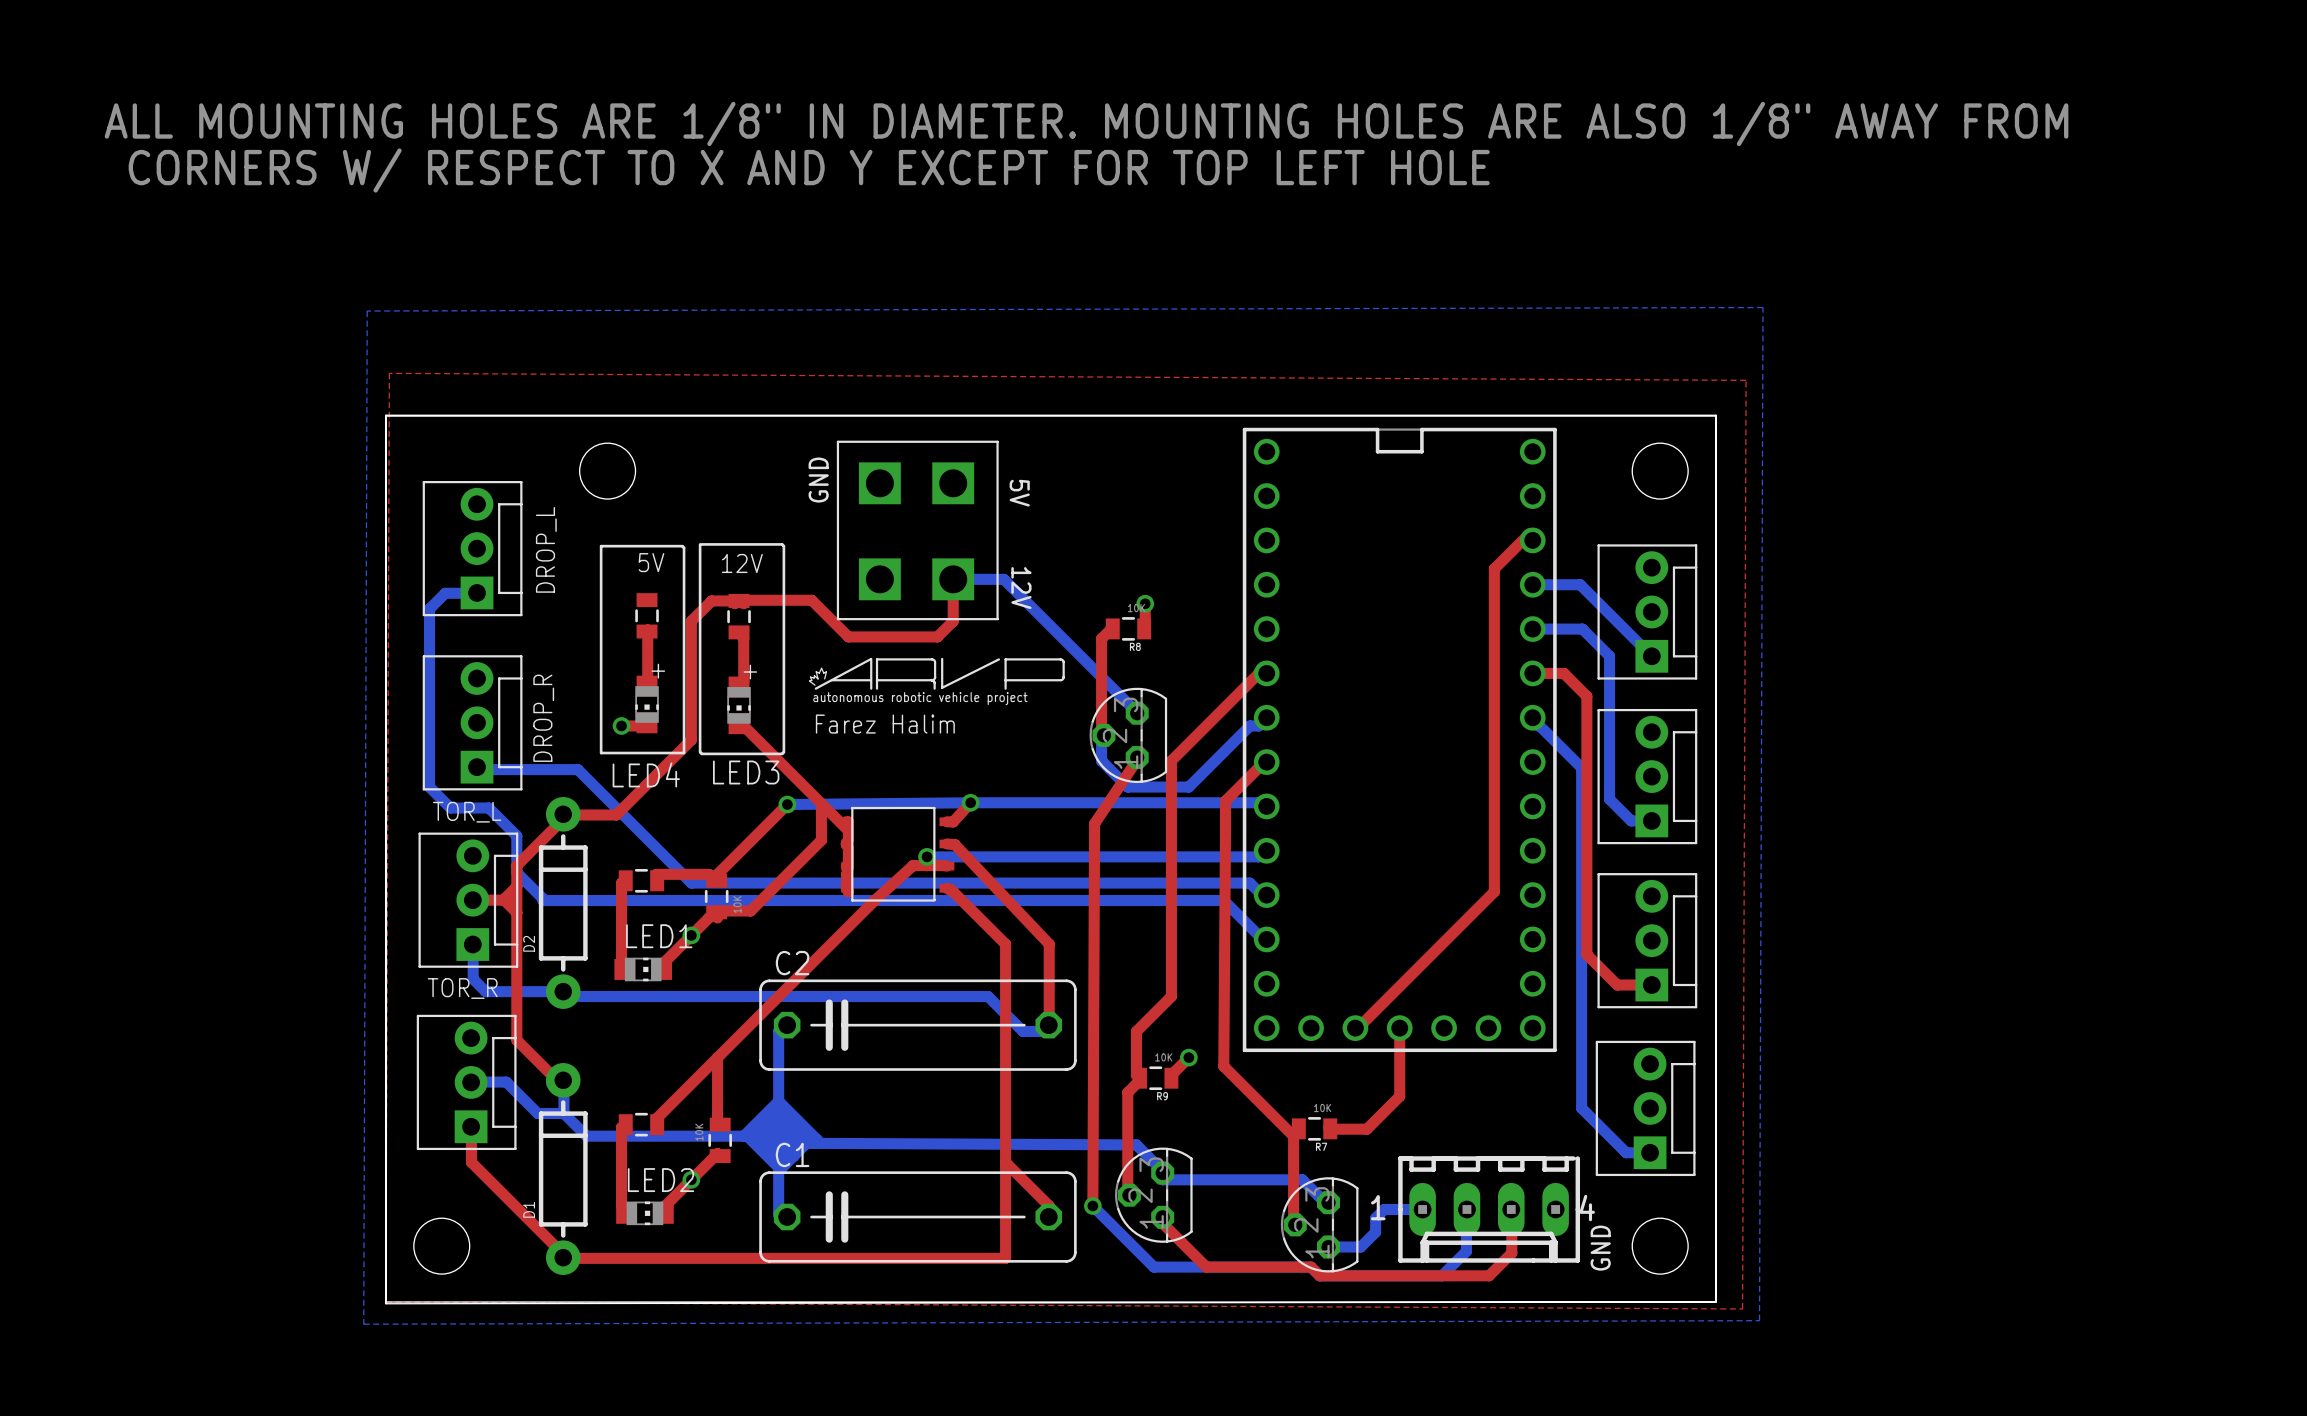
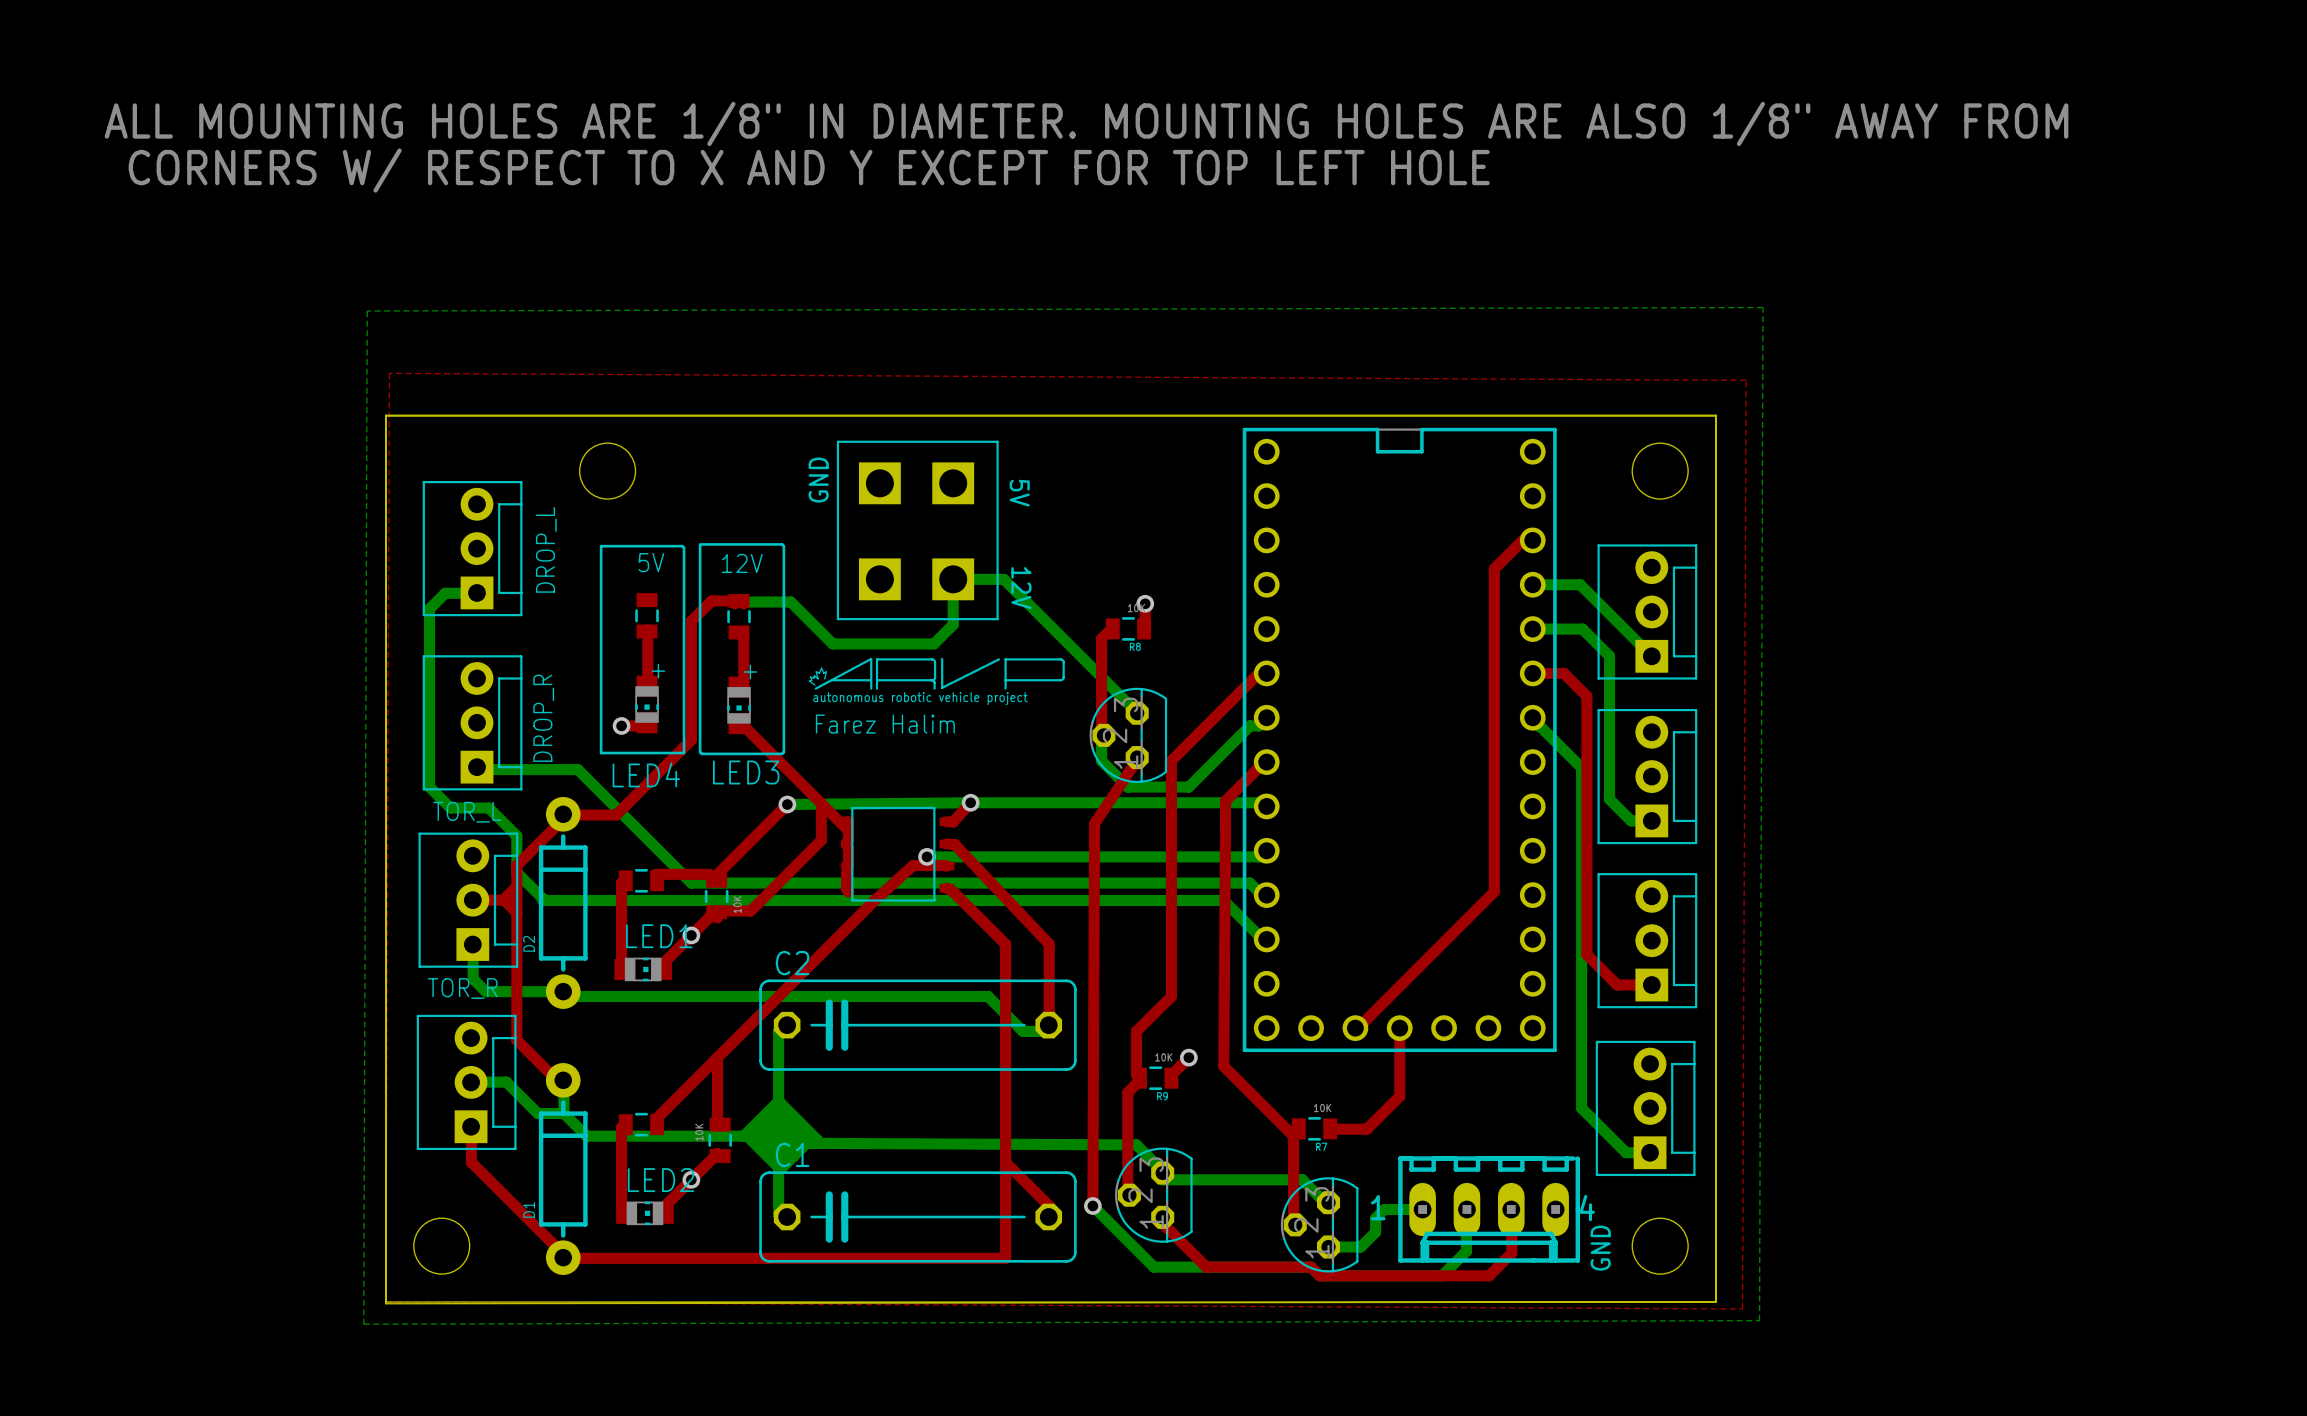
top track: (953, 579) (953, 621) (937, 636) (848, 636) (811, 600) (739, 600) -> none
bottom track: none -> (953, 579) (953, 624) (934, 643) (832, 643) (790, 602) (739, 600)

